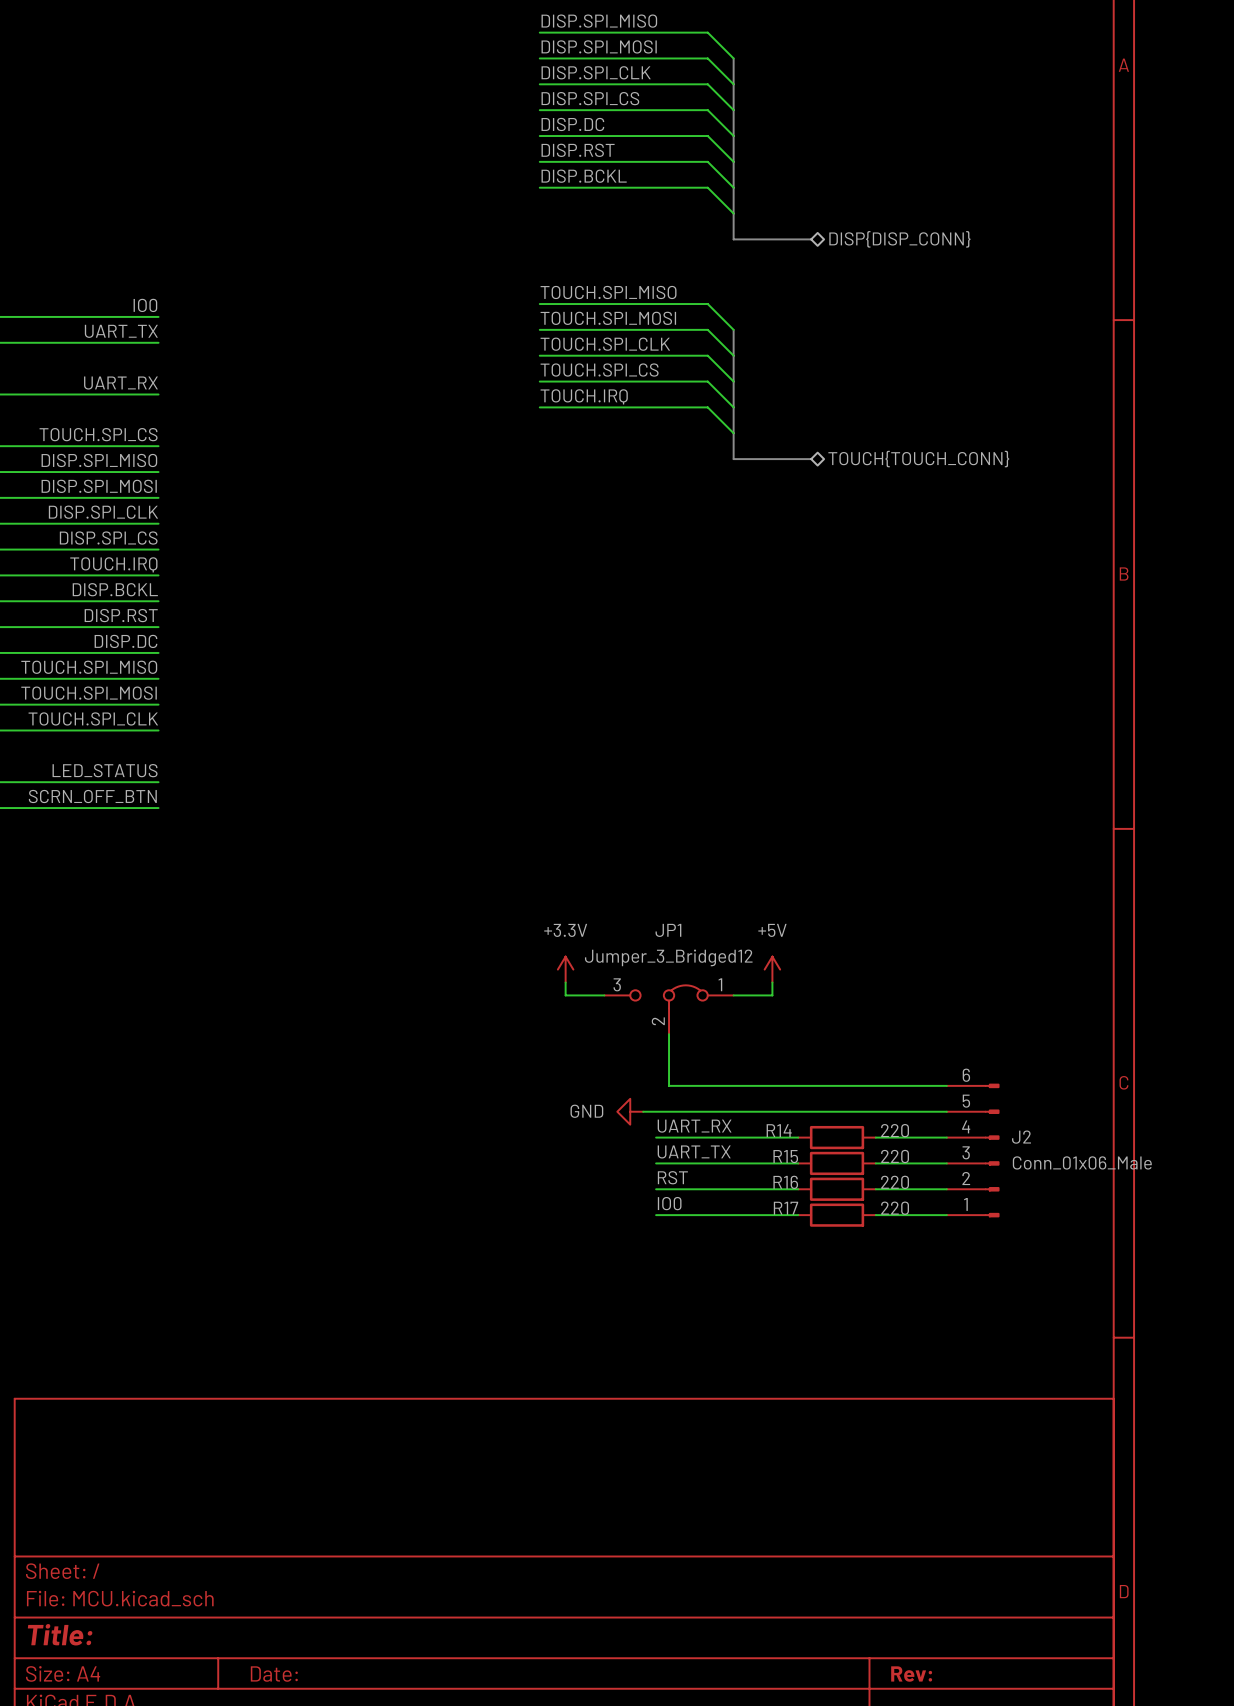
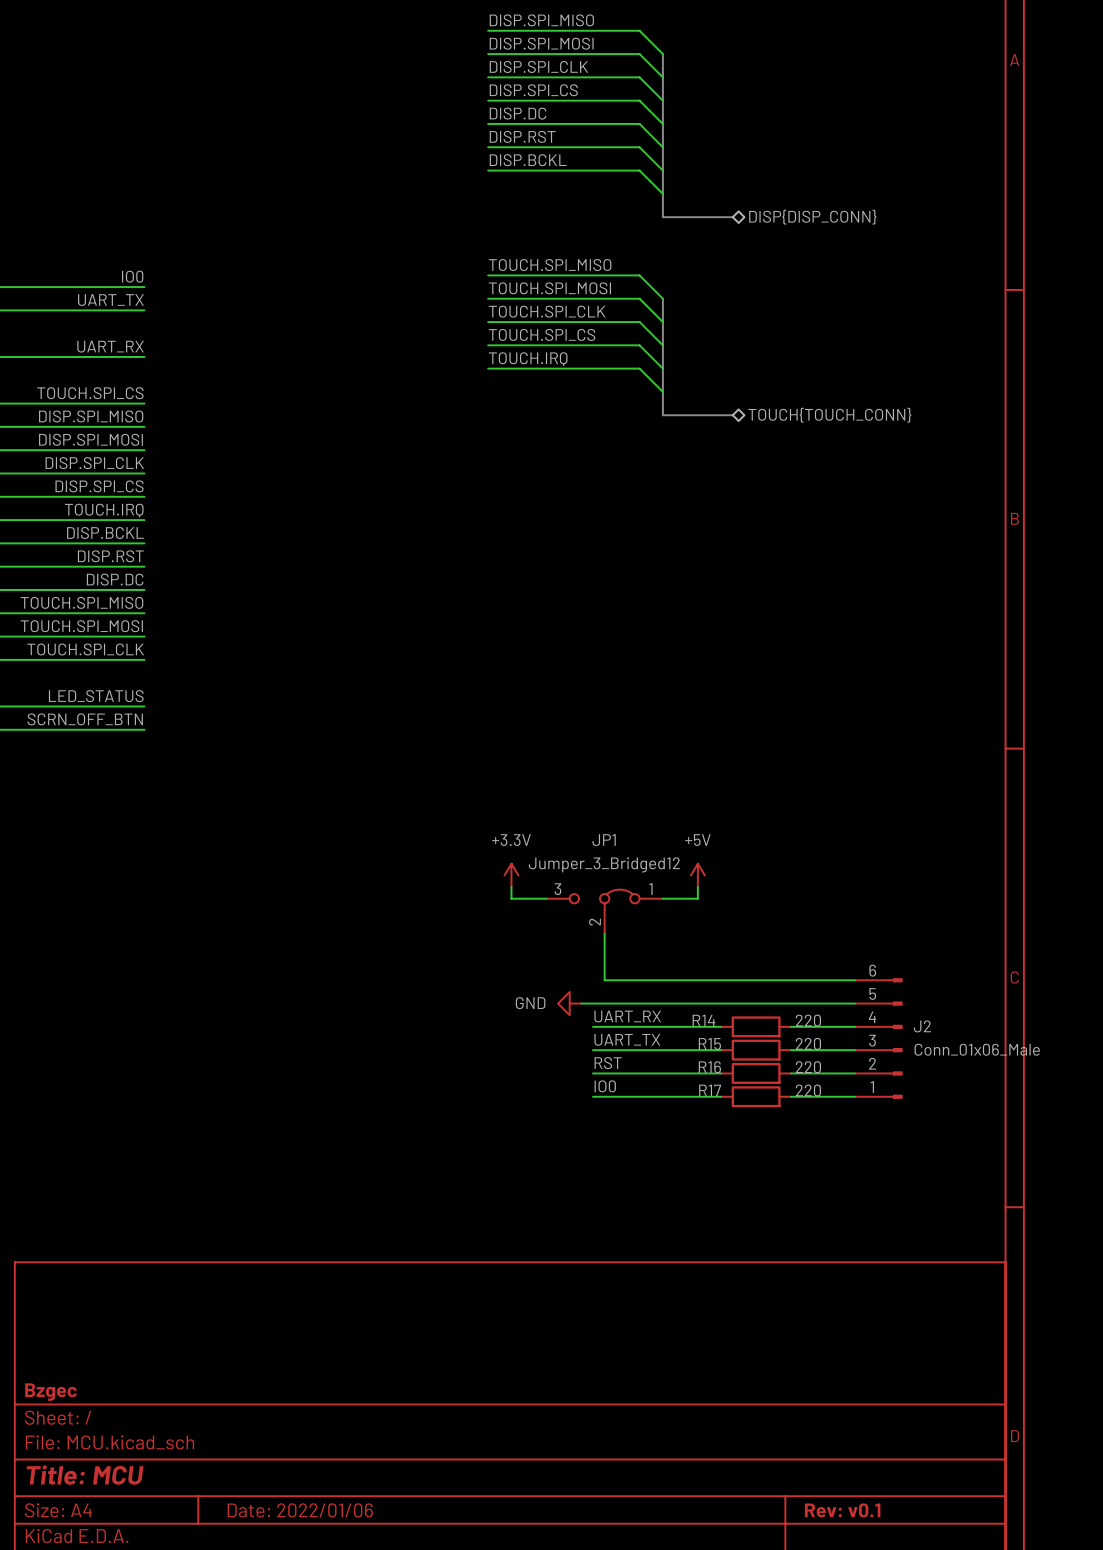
title block: none -> Bzgec (51, 1392)
title block: Title: (60, 1634) -> Title: MCU (85, 1475)
title block: Date: (274, 1674) -> Date: 2022/01/06 (300, 1510)
title block: Rev: (911, 1674) -> Rev: v0.1 (842, 1510)

